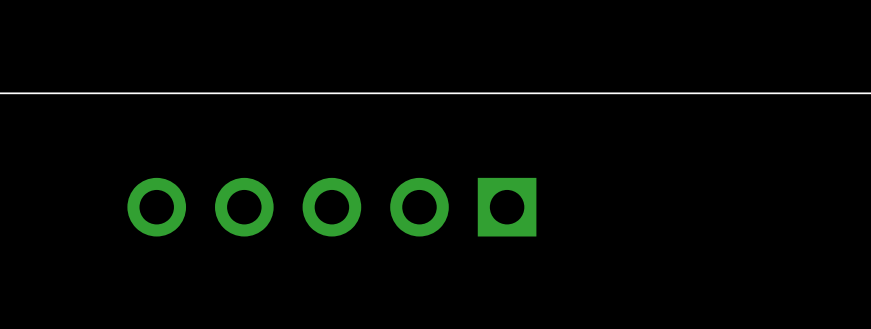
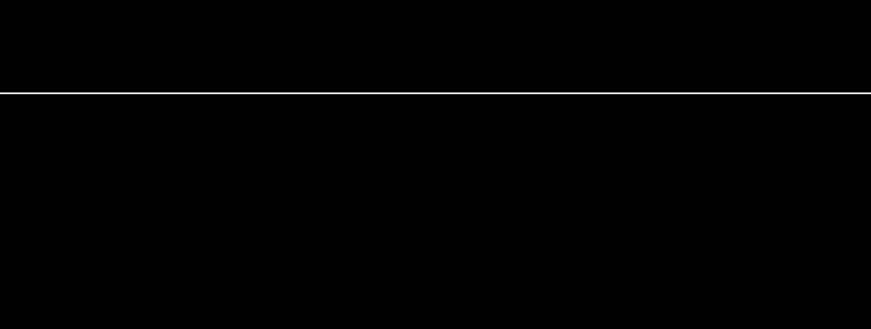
part: (331, 207) -> none

